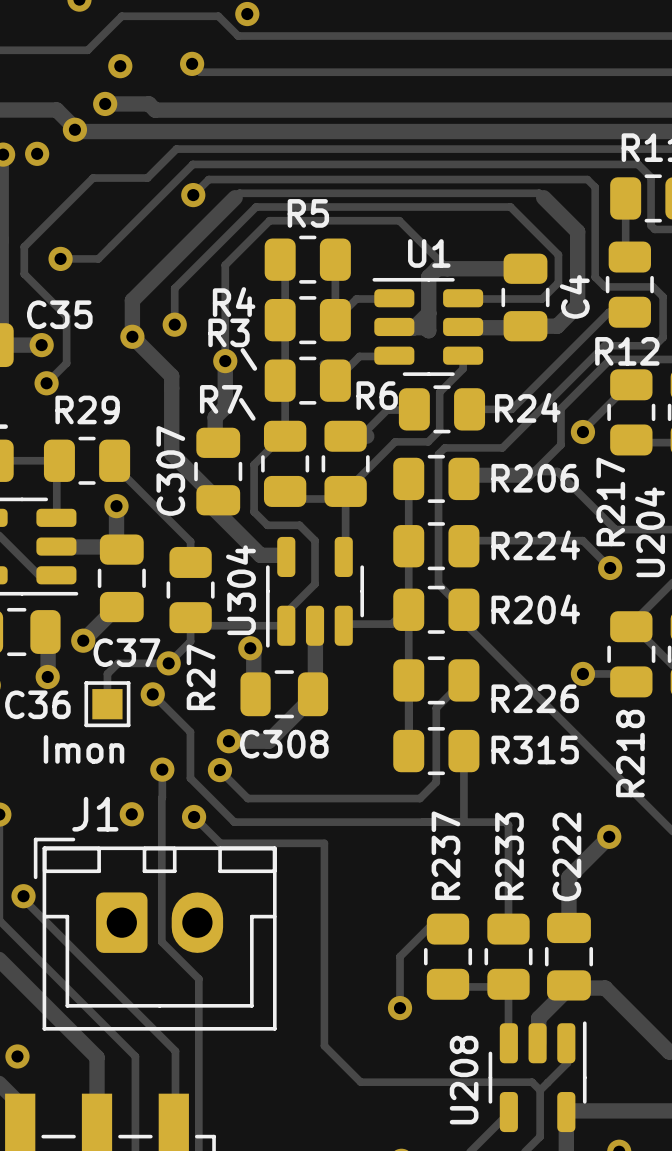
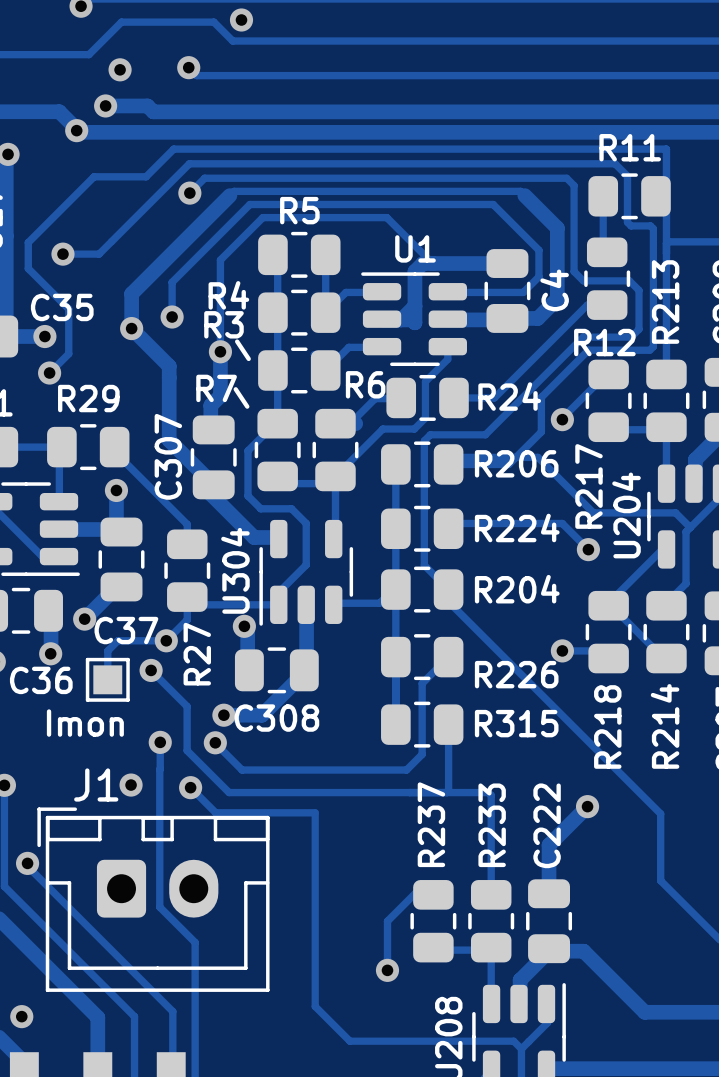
via: (37, 153) -> none

